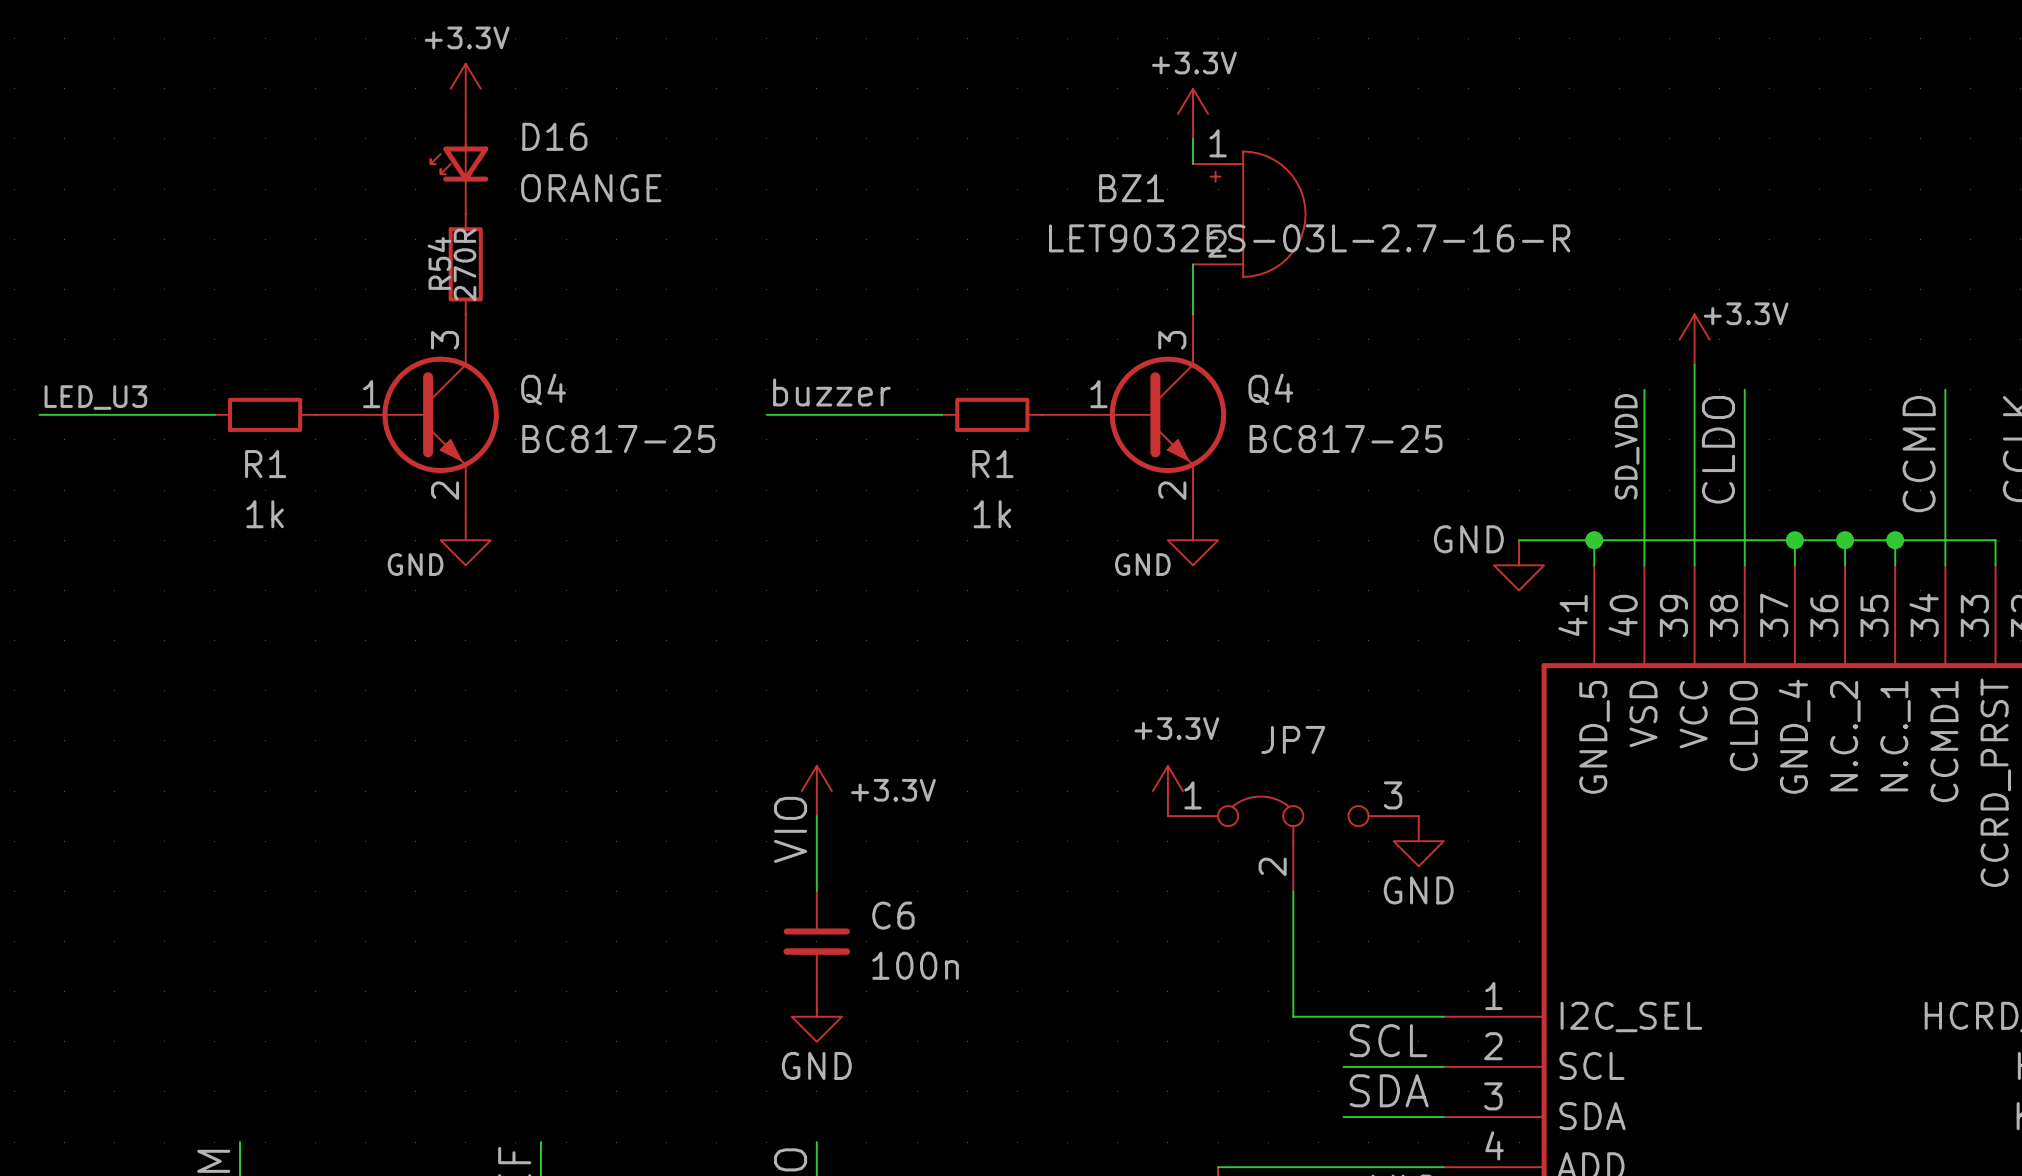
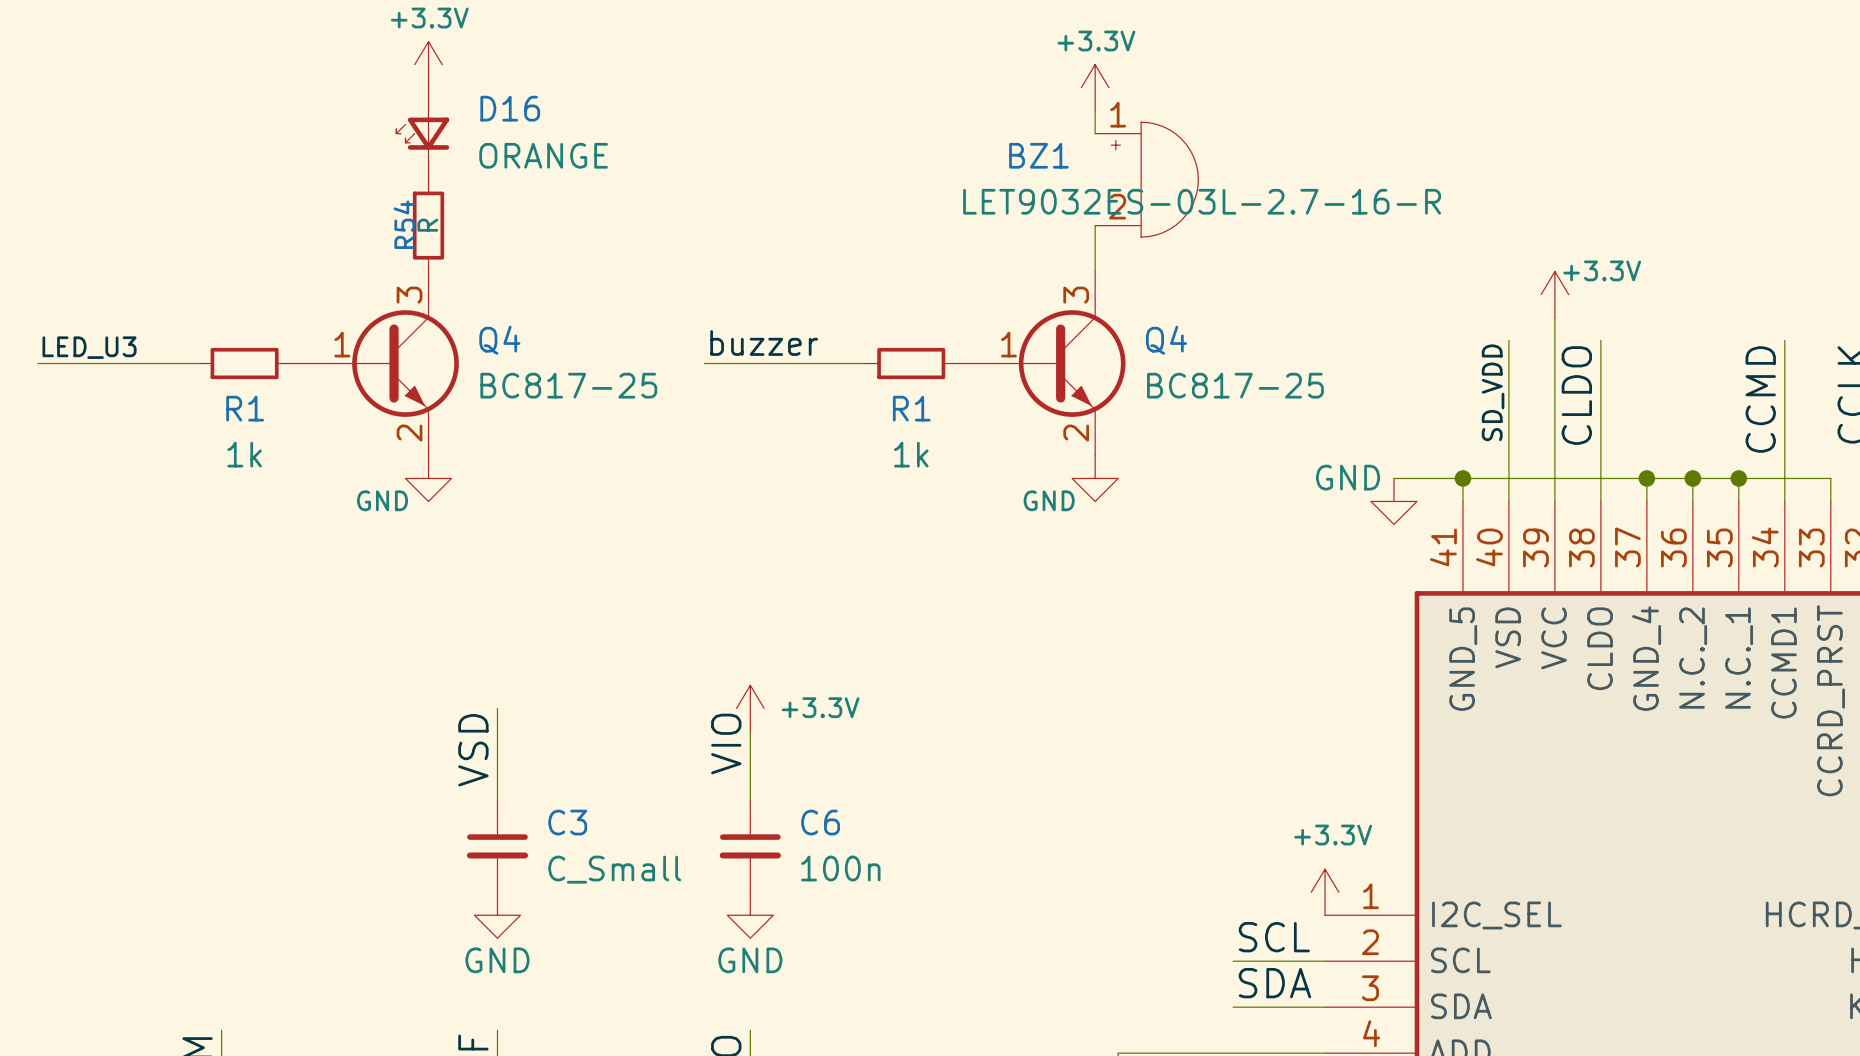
R54 value: 270R (464, 264) -> R (427, 225)
wire: none -> (497, 708) (497, 800)
power symbol position: +3.3V (1167, 791) -> +3.3V (1325, 892)
label: none -> VSD (473, 750)
power symbol: GND (1418, 841) -> none
JP7: (1293, 843) -> none
wire: (1293, 891) (1293, 1016) (1443, 1016) -> none
C3: none -> C_Small (497, 846)
power symbol: none -> GND (497, 915)

